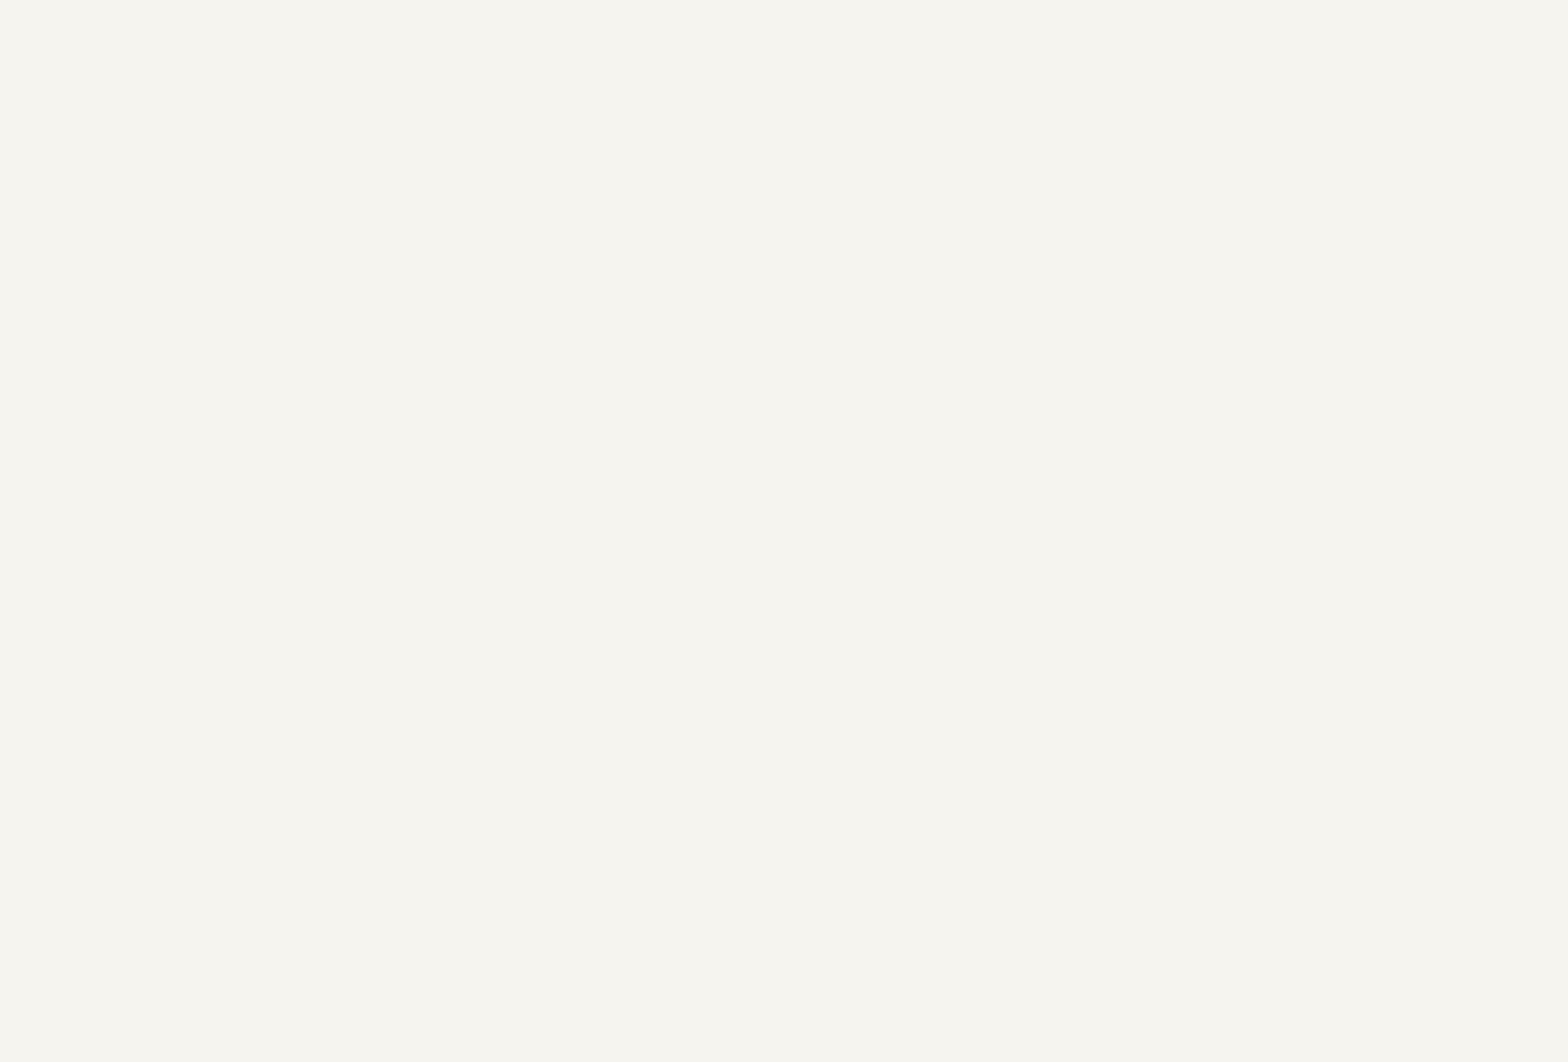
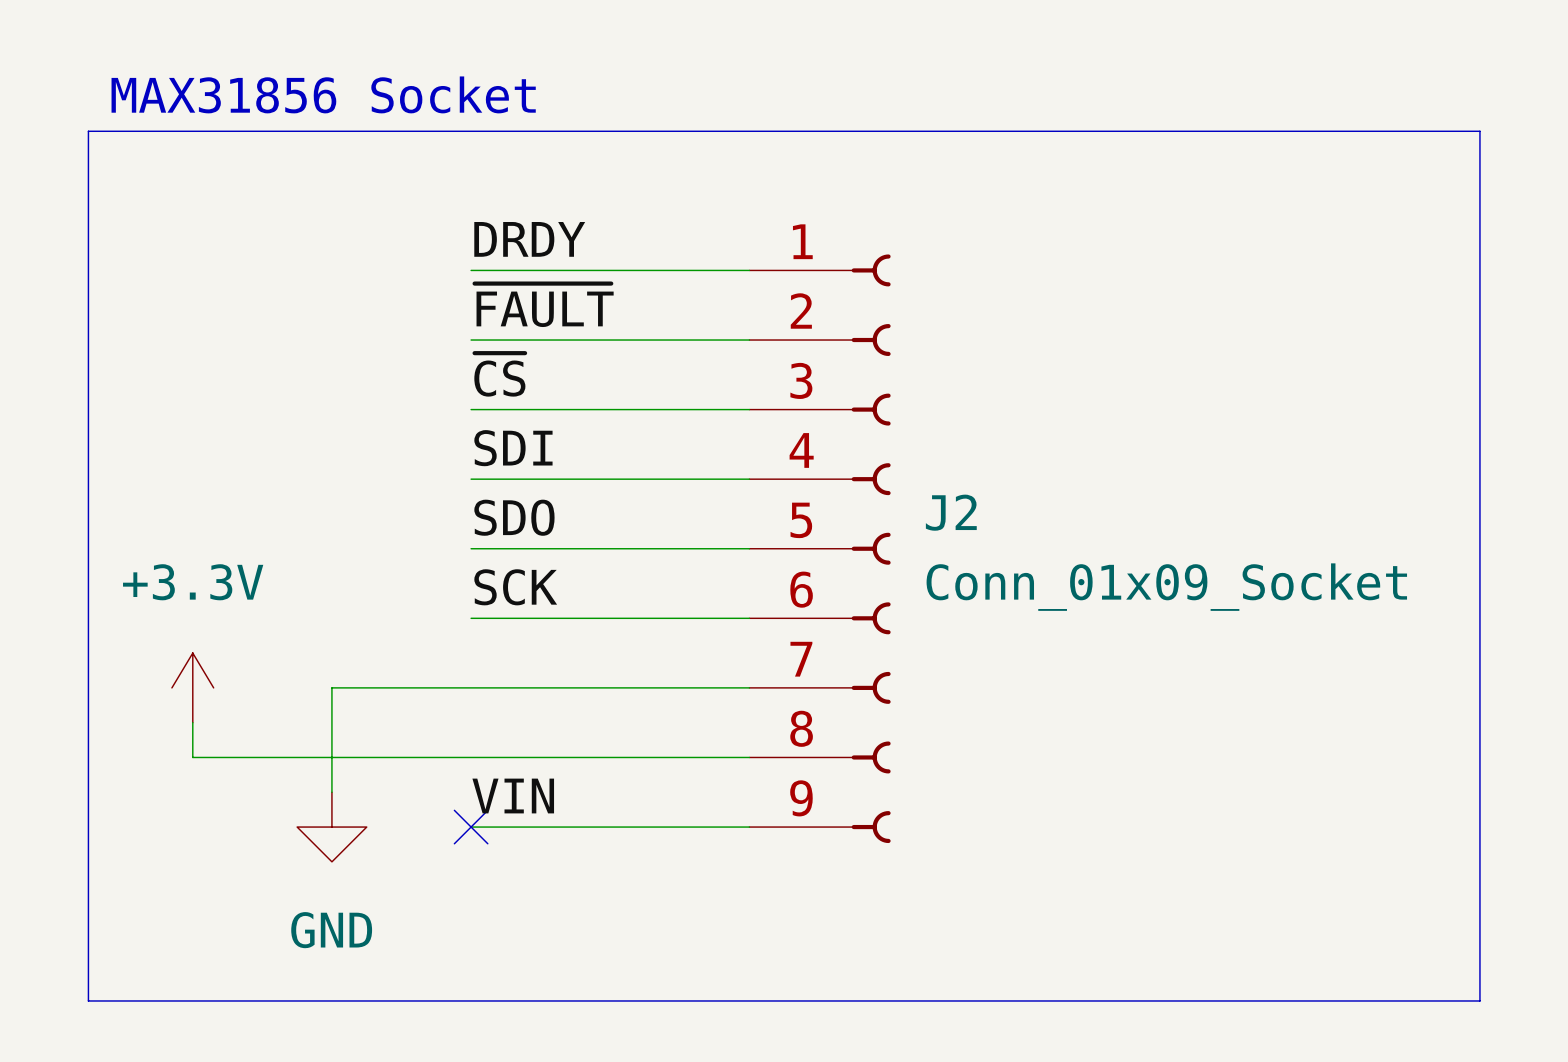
text: none -> MAX31856 Socket (323, 94)
line: none -> (88, 131) (1479, 131) (1479, 1000) (88, 1000) (88, 131)
label: none -> DRDY (529, 239)
wire: none -> (471, 270) (749, 270)
label: none -> ~{FAULT} (544, 305)
wire: none -> (471, 340) (749, 340)
label: none -> ~{CS} (499, 374)
wire: none -> (471, 409) (749, 409)
label: none -> SDI (513, 448)
wire: none -> (471, 479) (749, 479)
label: none -> SDO (514, 517)
wire: none -> (471, 548) (749, 548)
J2: none -> Conn_01x09_Socket (820, 548)
label: none -> SCK (515, 587)
wire: none -> (471, 618) (749, 618)
power symbol: none -> +3.3V (192, 687)
wire: none -> (749, 687) (331, 687) (331, 792)
wire: none -> (192, 722) (192, 757) (749, 757)
label: none -> VIN (513, 796)
power symbol: none -> GND (331, 827)
wire: none -> (471, 827) (749, 827)
no-connect mark: none -> (471, 827)

